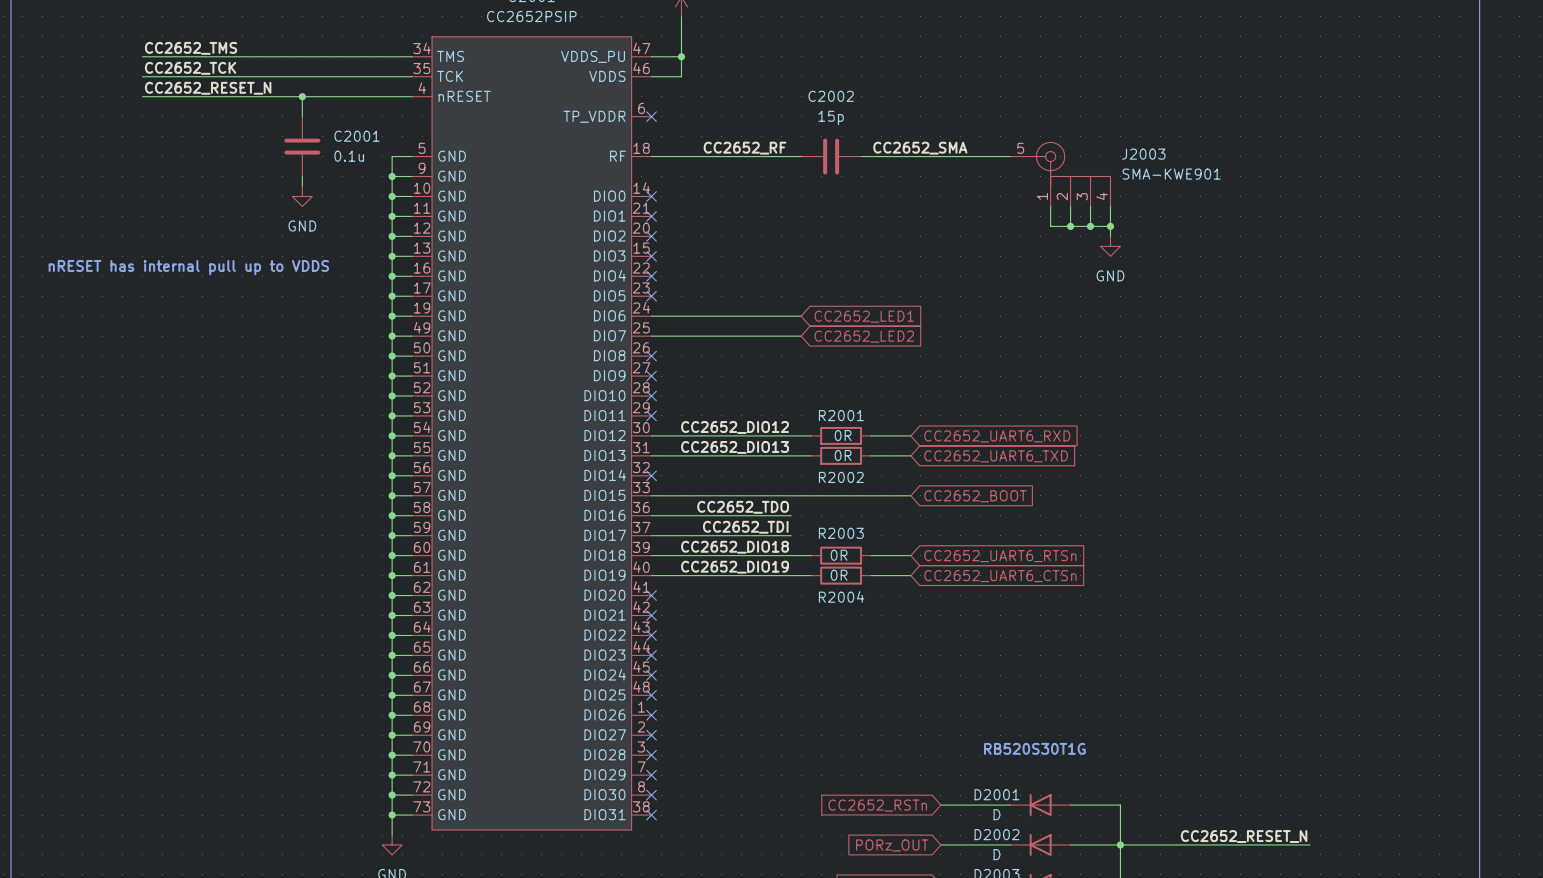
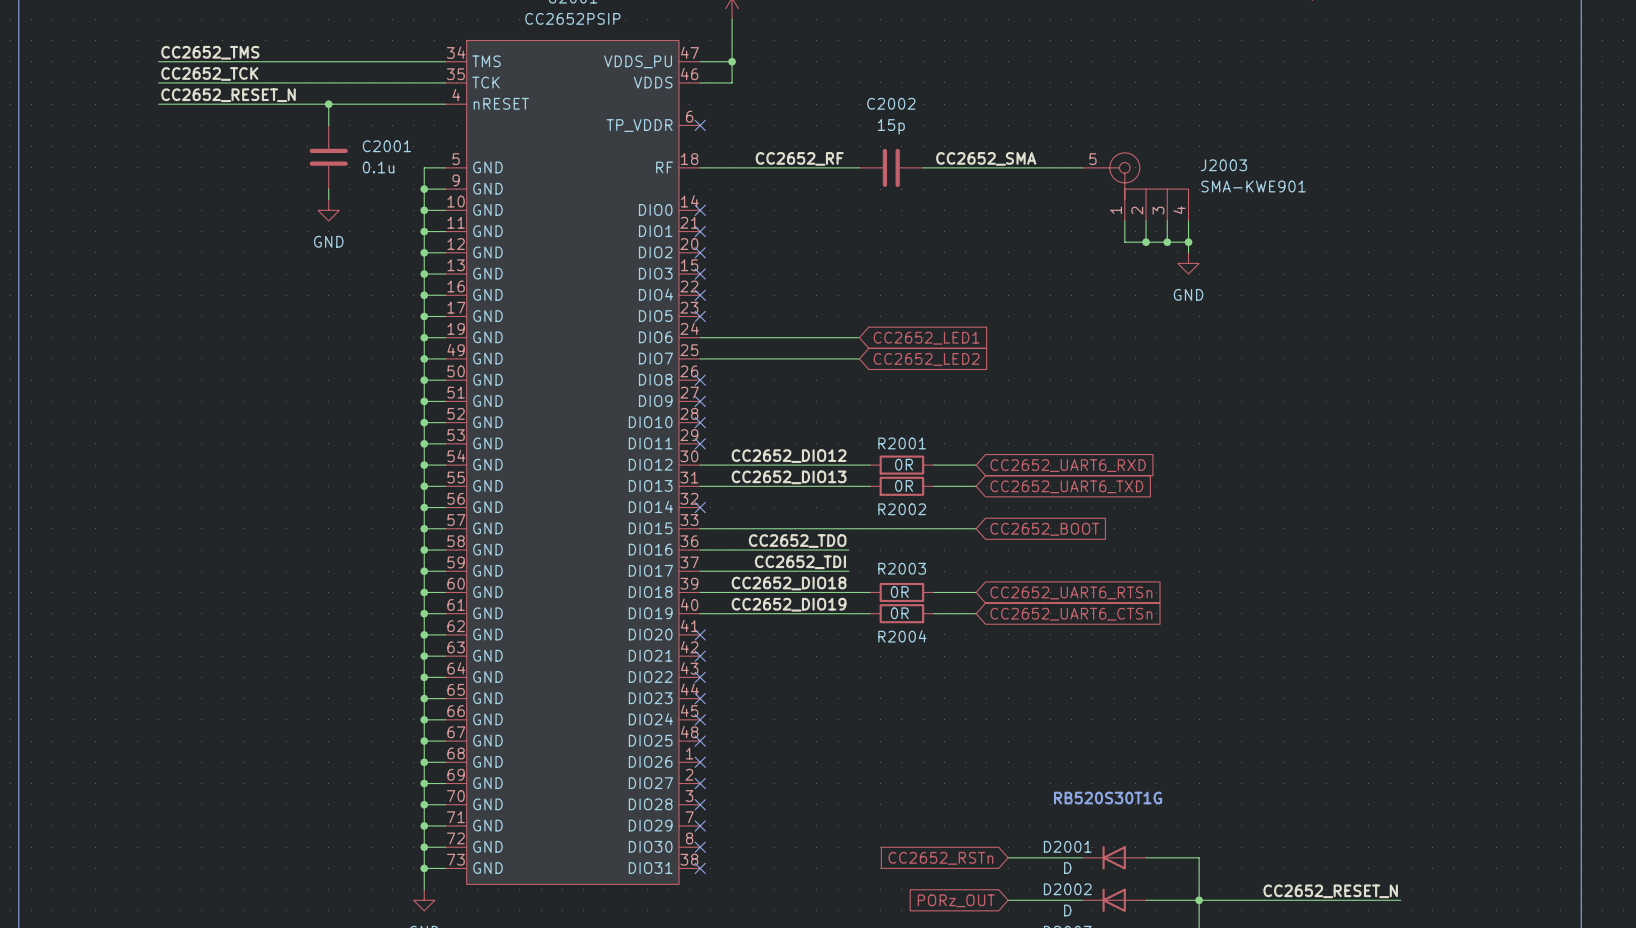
text: nRESET has internal pull up to VDDS (188, 267) -> none

